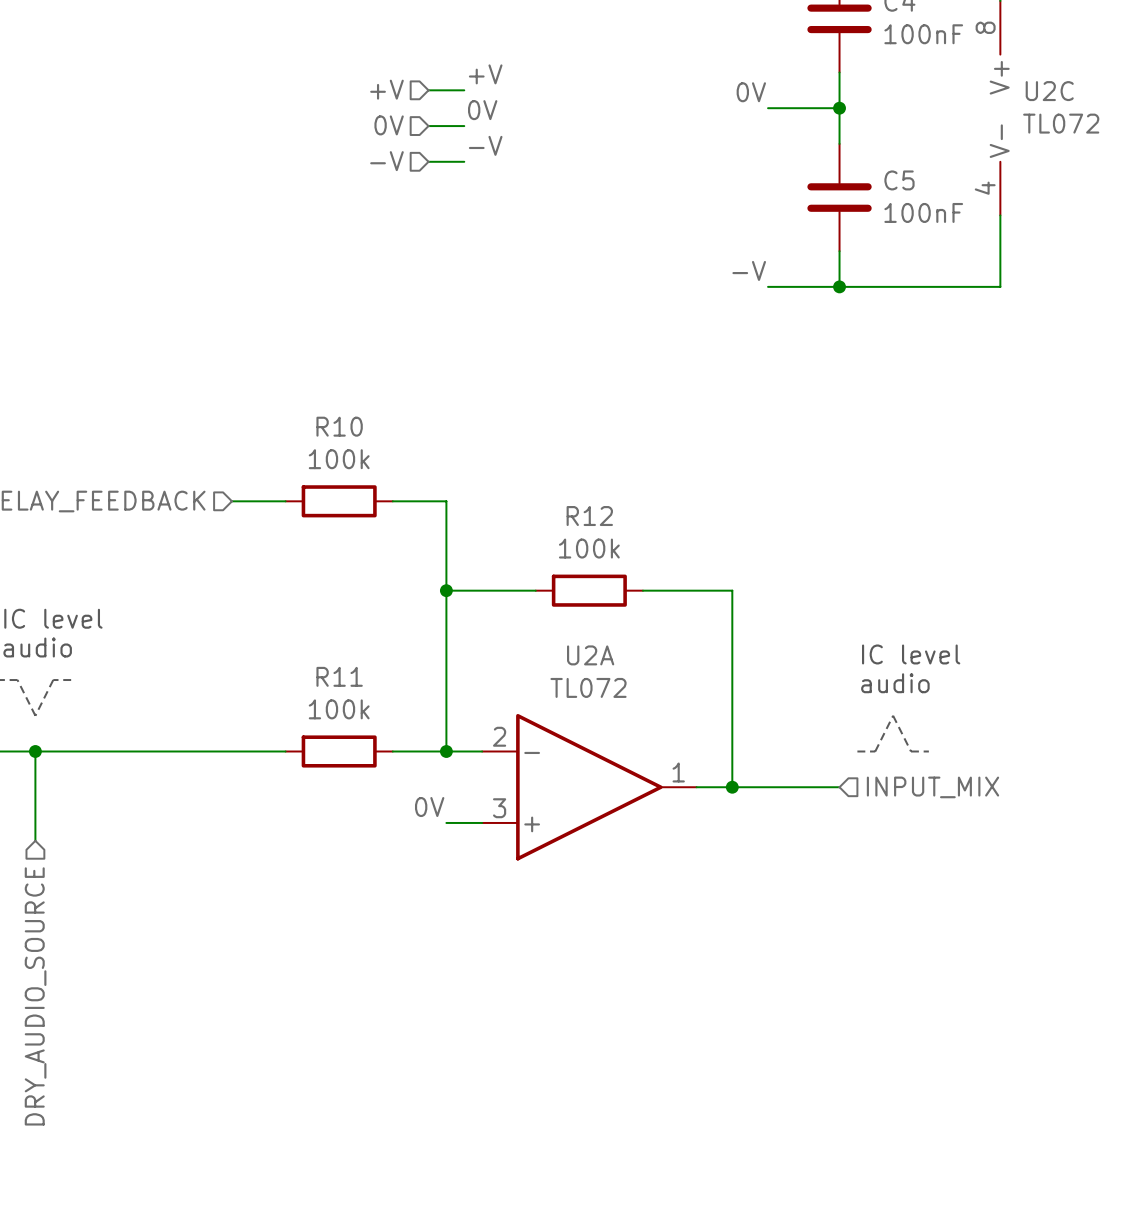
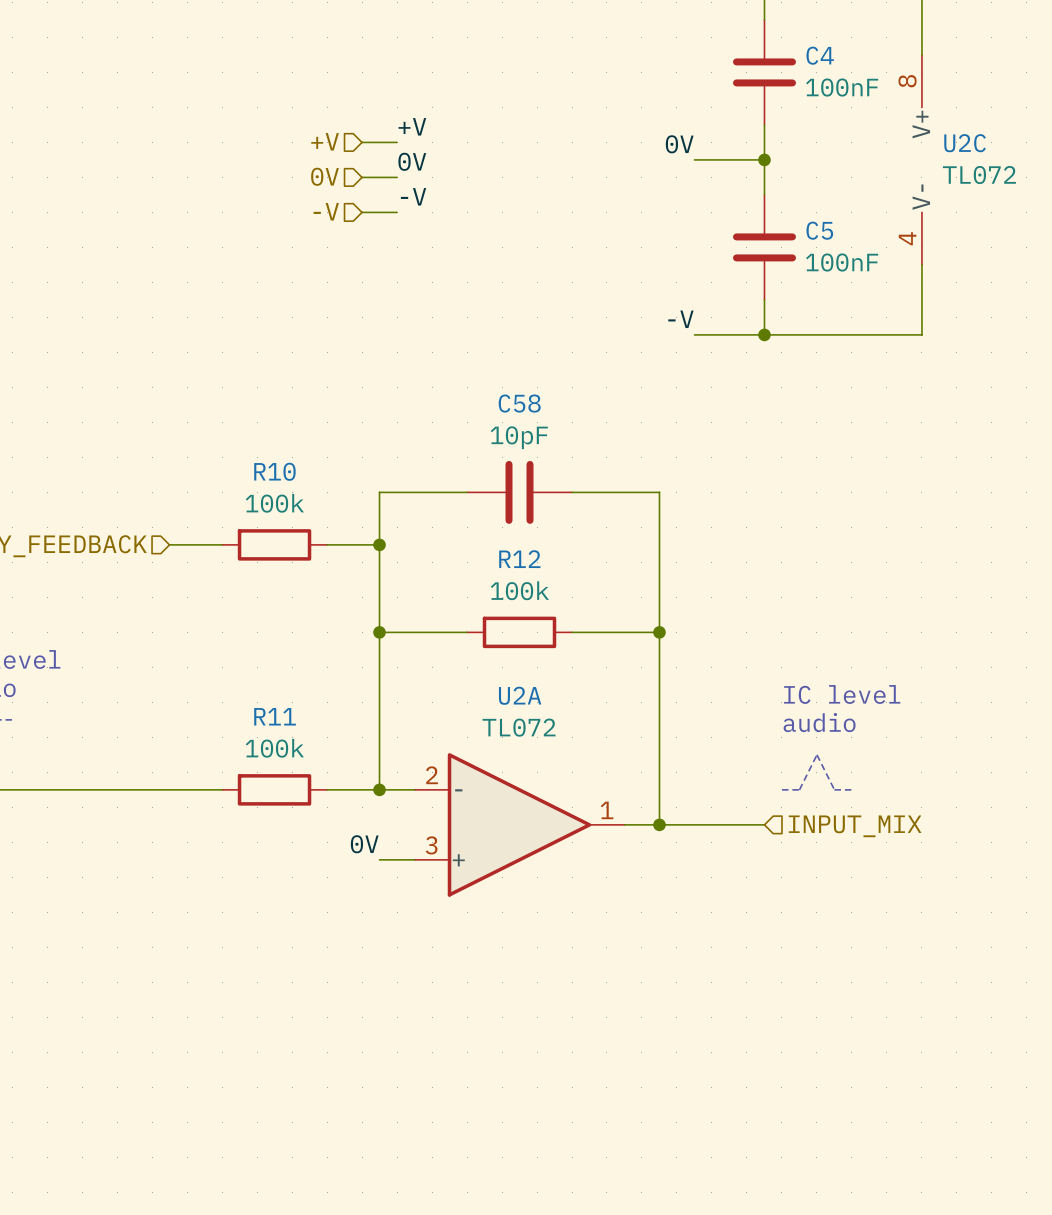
wire: none -> (467, 492) (379, 492) (379, 544)
C58: none -> 10pF (519, 492)
wire: none -> (572, 492) (659, 492) (659, 632)
junction: none -> (379, 544)
junction: none -> (659, 632)

